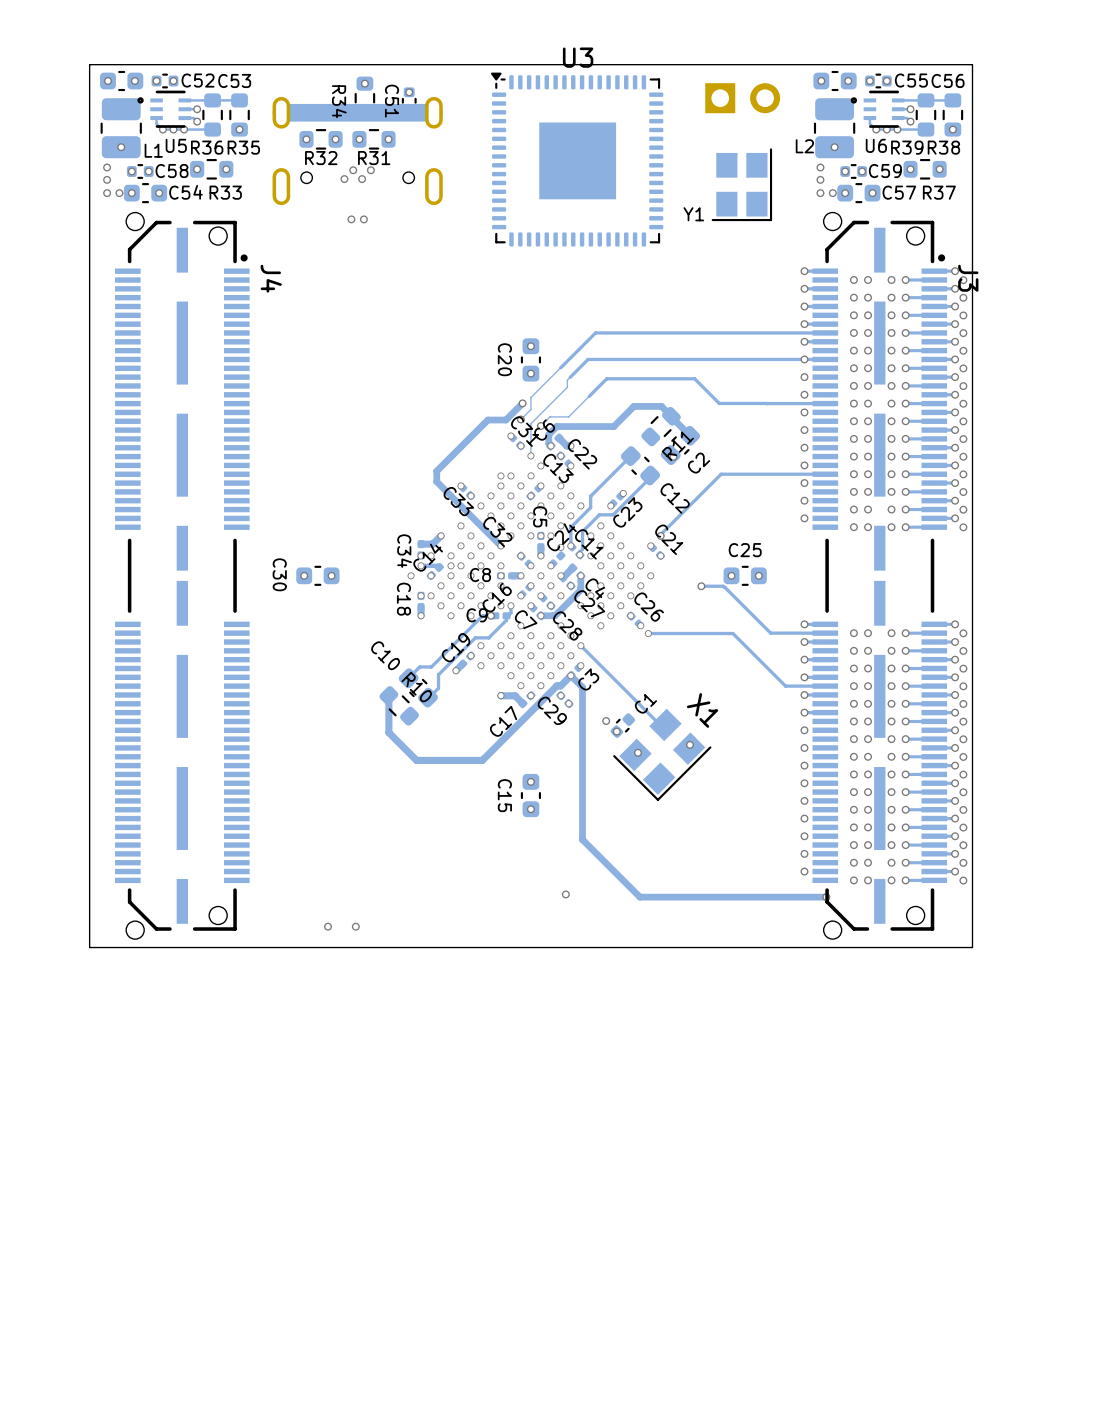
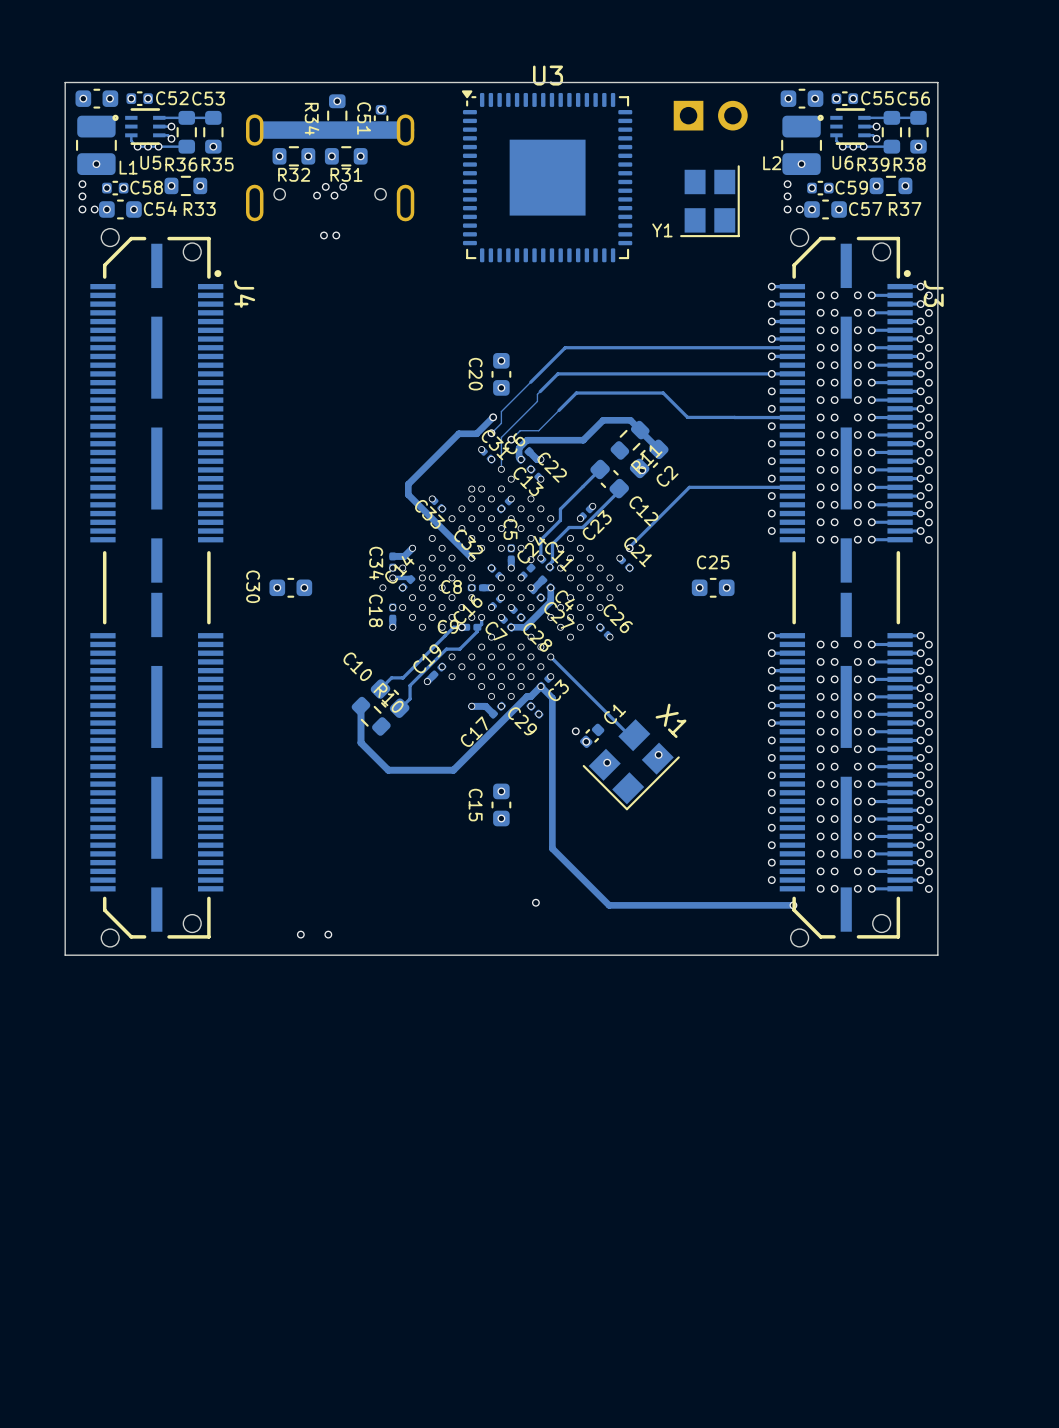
track: (701, 586) (725, 587) (770, 633) (825, 633) -> none
via: (701, 586) -> none
track: (648, 633) (732, 633) (785, 686) (825, 686) -> none
via: (648, 633) -> none

